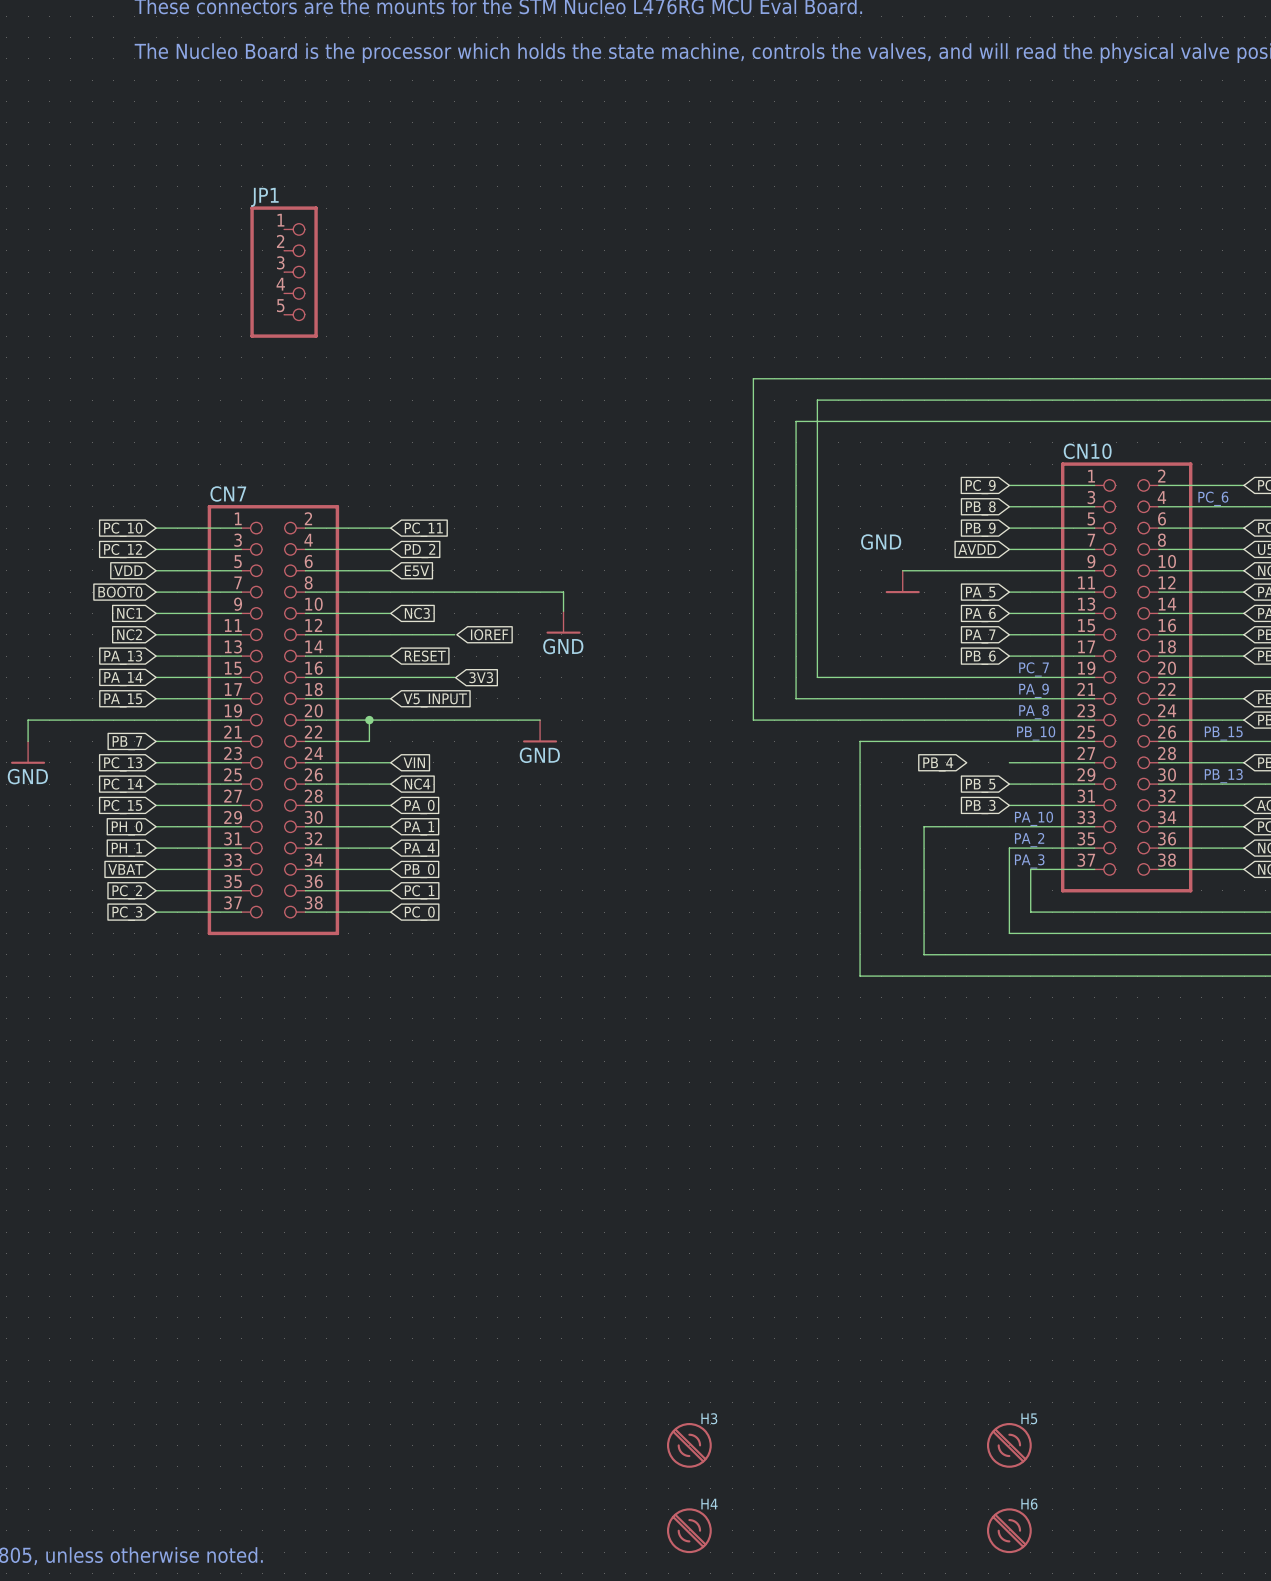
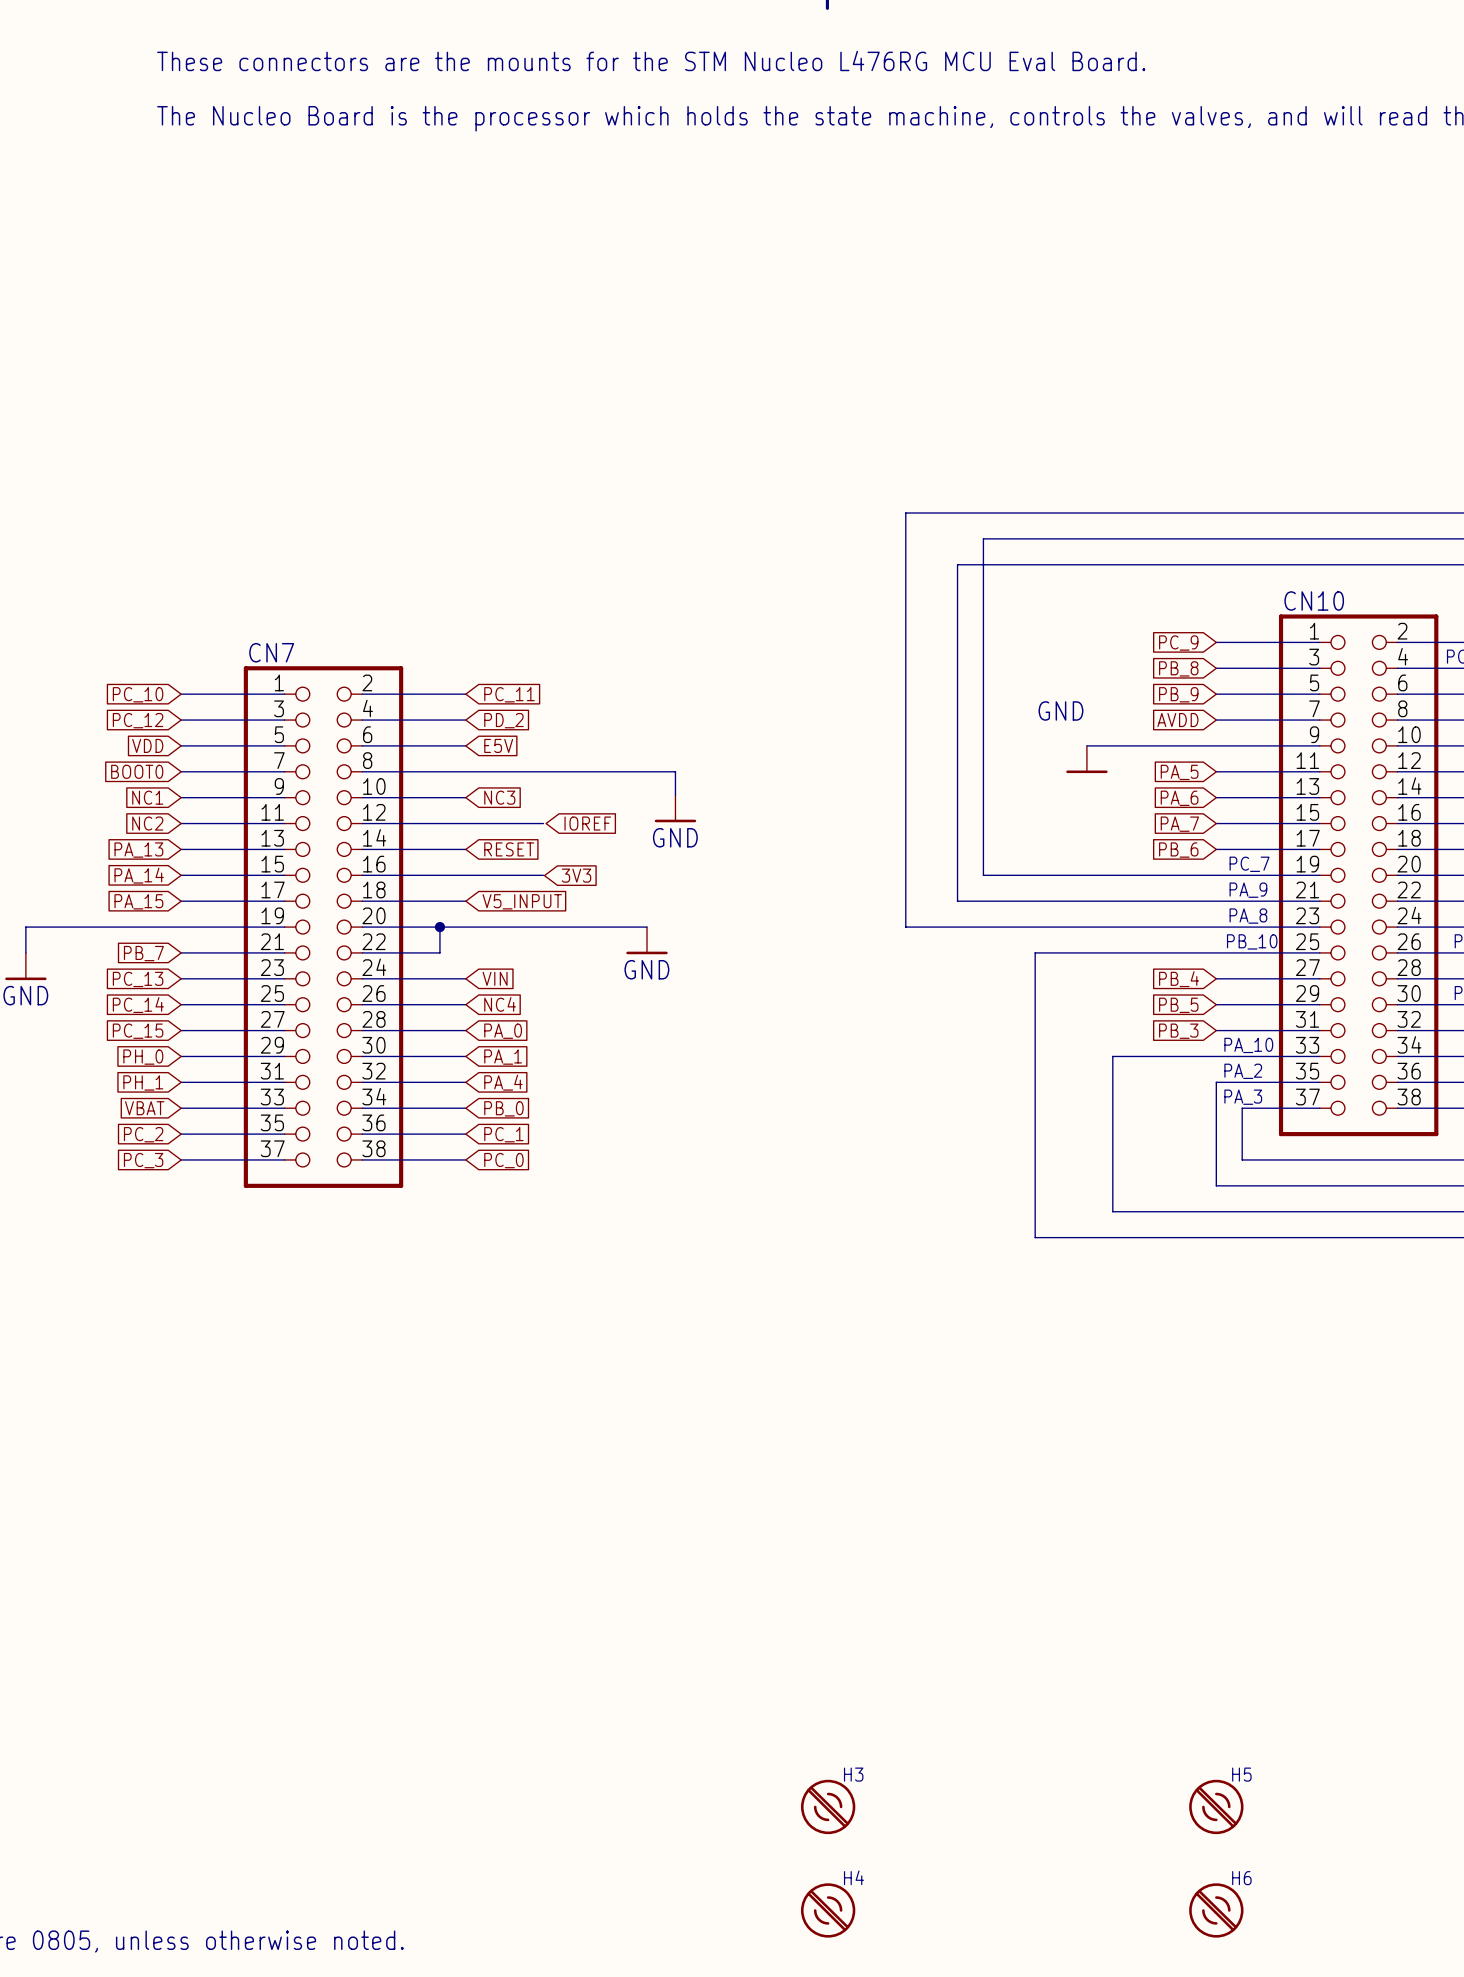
JP1: (284, 272) -> none
global label position: PB_4 (938, 764) -> PB_4 (1179, 979)

